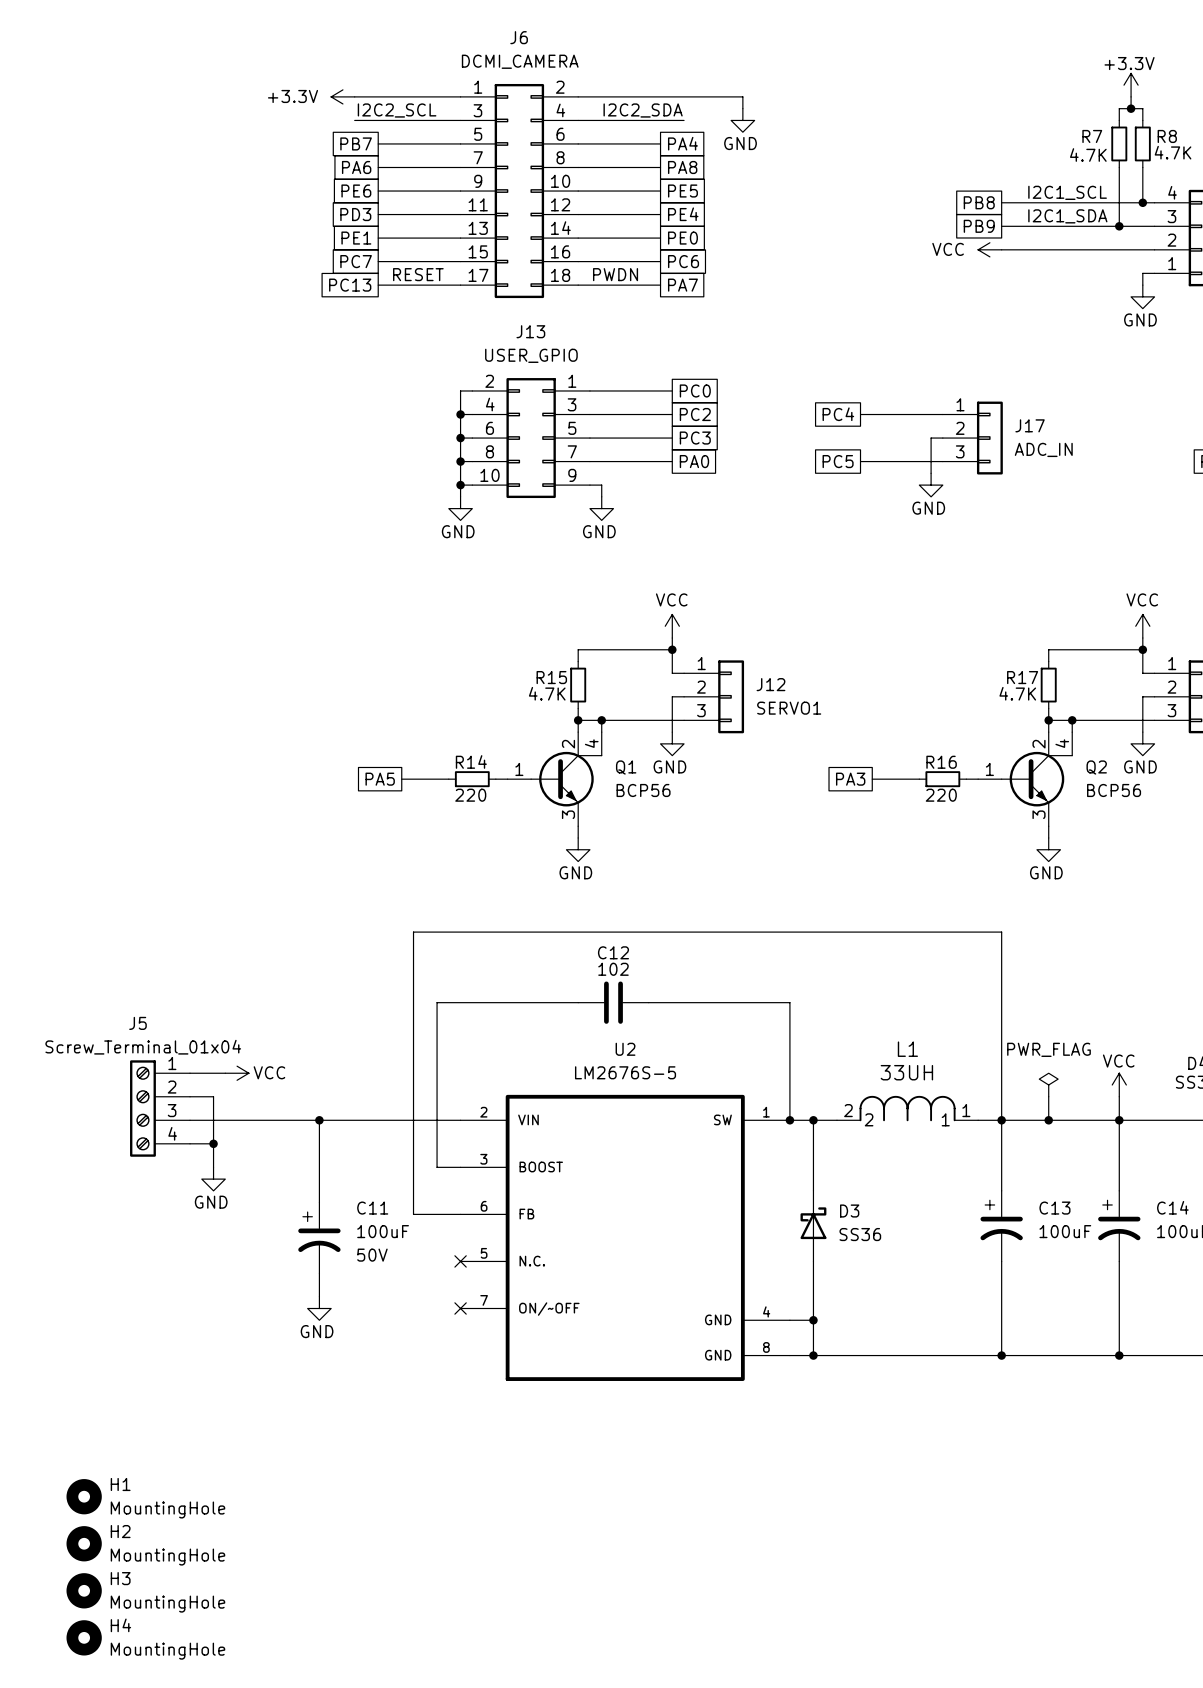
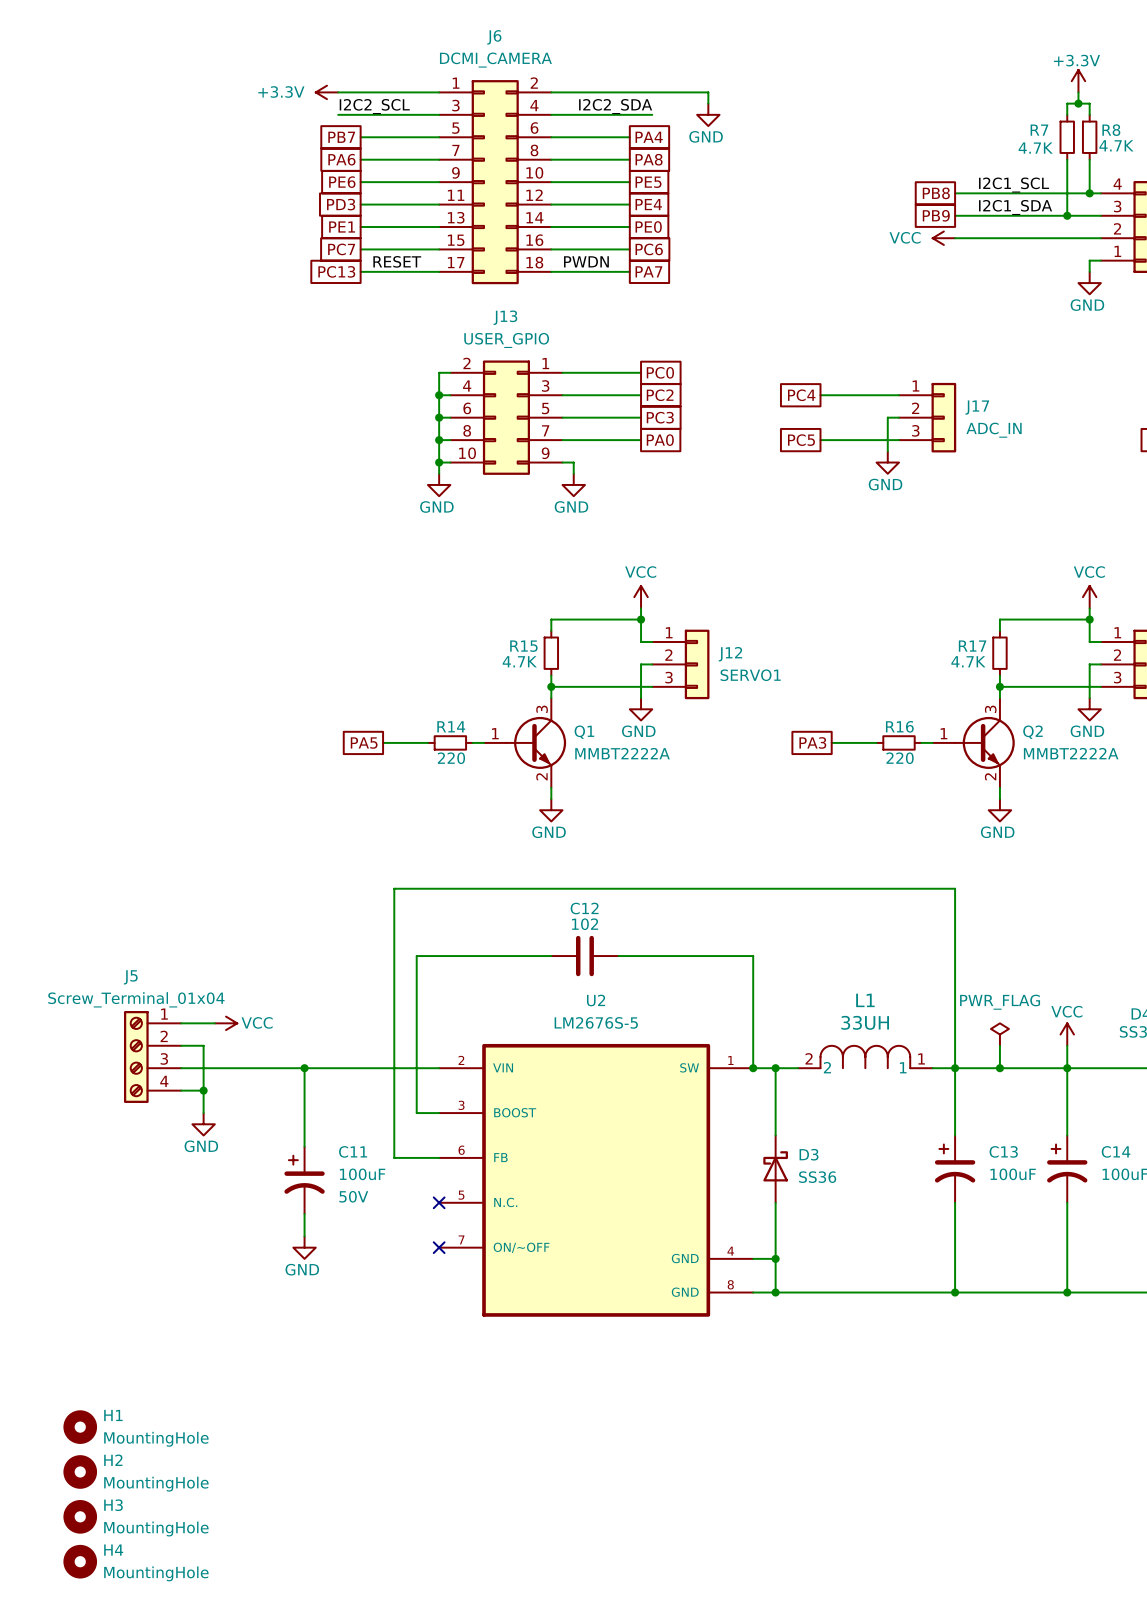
wire: (601, 720) (601, 732) -> none
junction: (601, 720) -> none
wire: (1072, 720) (1072, 732) -> none
junction: (1072, 720) -> none
Q1 symbol: [507, 732, 602, 827] -> [484, 698, 567, 788]
Q2 symbol: [978, 732, 1073, 827] -> [932, 698, 1015, 788]
Q1 value: BCP56 (643, 790) -> MMBT2222A (622, 753)
Q2 value: BCP56 (1114, 790) -> MMBT2222A (1071, 753)

